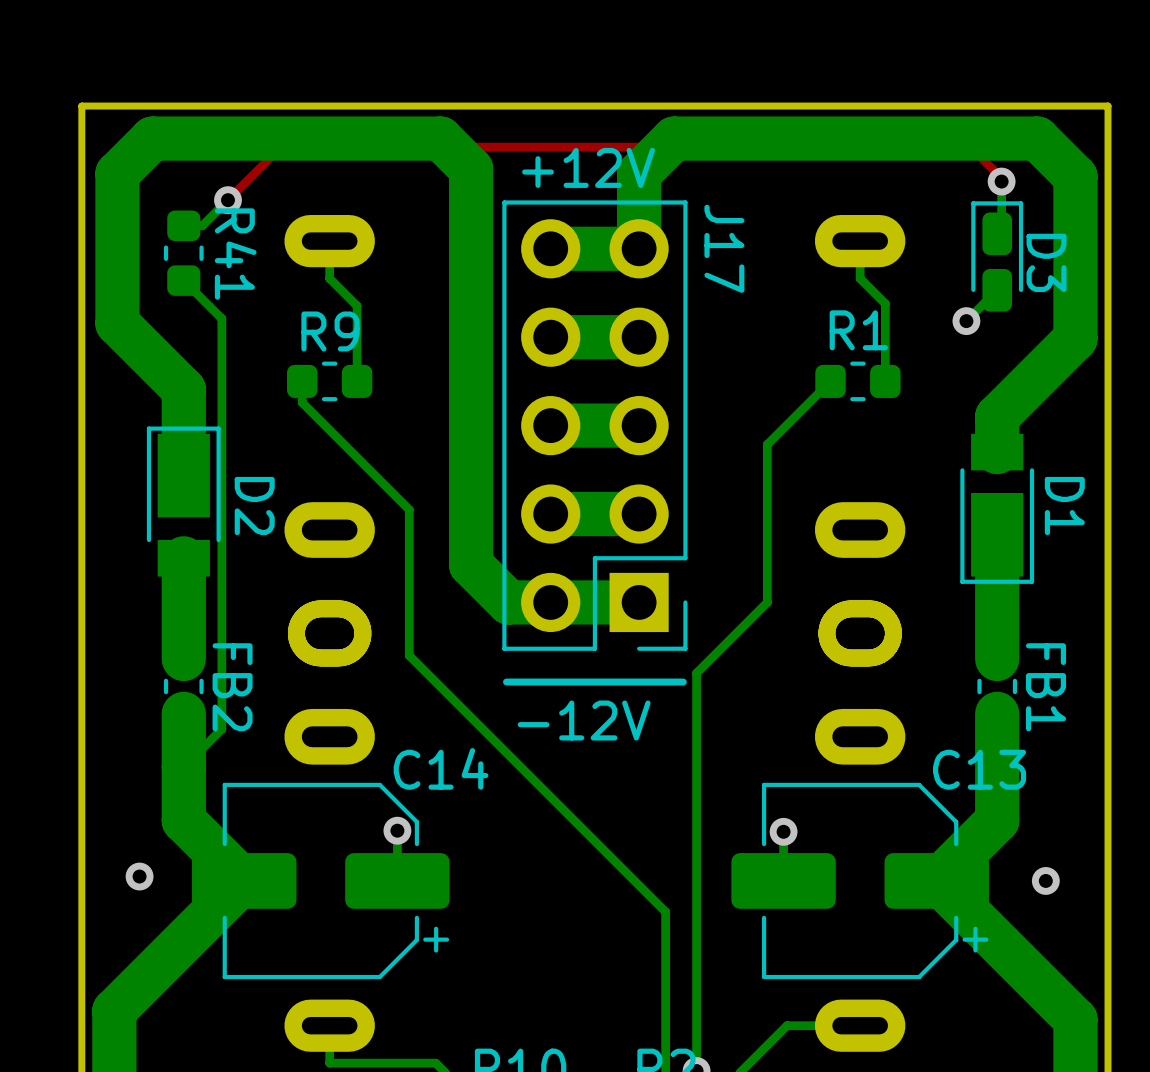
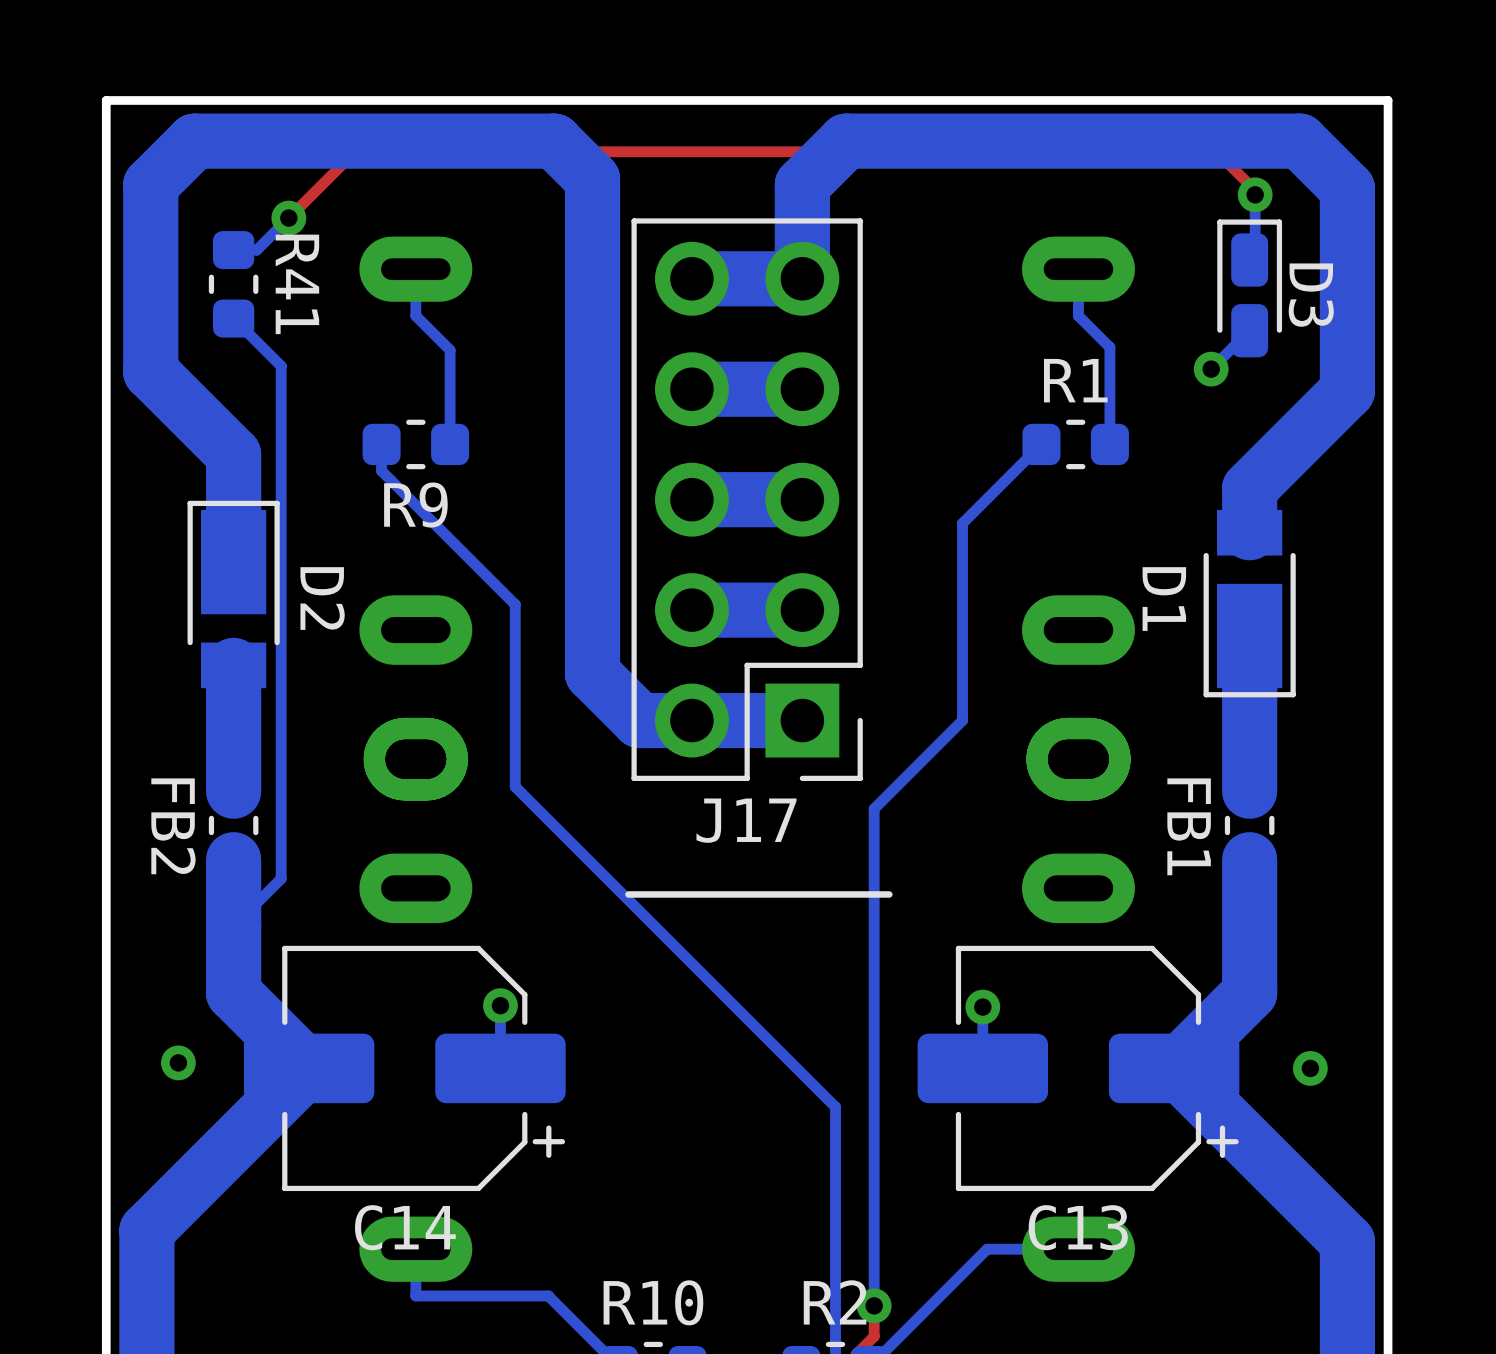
text: +12V (588, 167) -> none
J17 footprint: [502, 200, 688, 651] -> [625, 218, 893, 898]
J17 name position: J17 (724, 248) -> J17 (746, 820)
R9 name position: R9 (330, 331) -> R9 (415, 505)
D1 name position: D1 (1064, 506) -> D1 (1164, 599)
line: (683, 682) (506, 682) -> none
FB2 name position: FB2 (232, 687) -> FB2 (173, 826)
FB1 name position: FB1 (1045, 687) -> FB1 (1189, 826)
text: -12V (584, 720) -> none
C14 name position: C14 (441, 768) -> C14 (405, 1227)
C13 name position: C13 (979, 769) -> C13 (1078, 1227)

